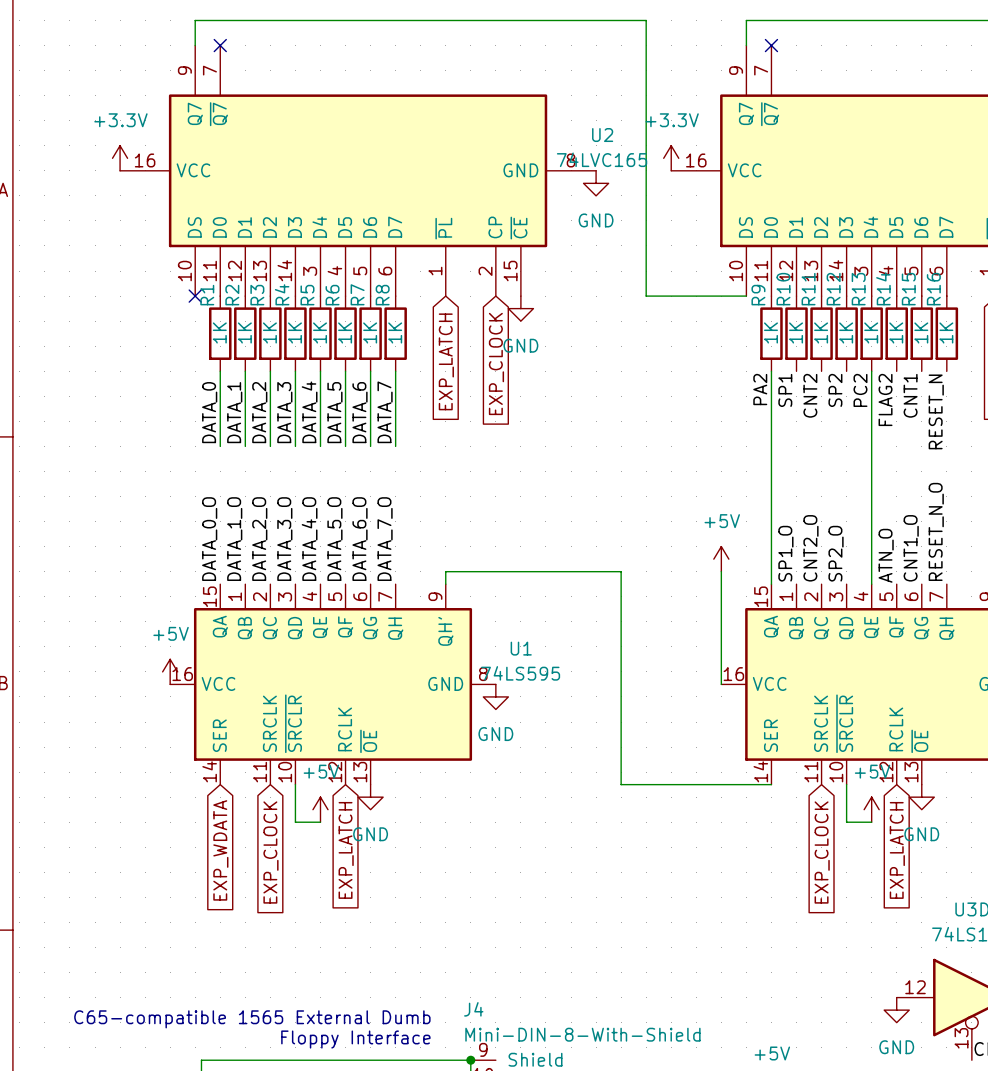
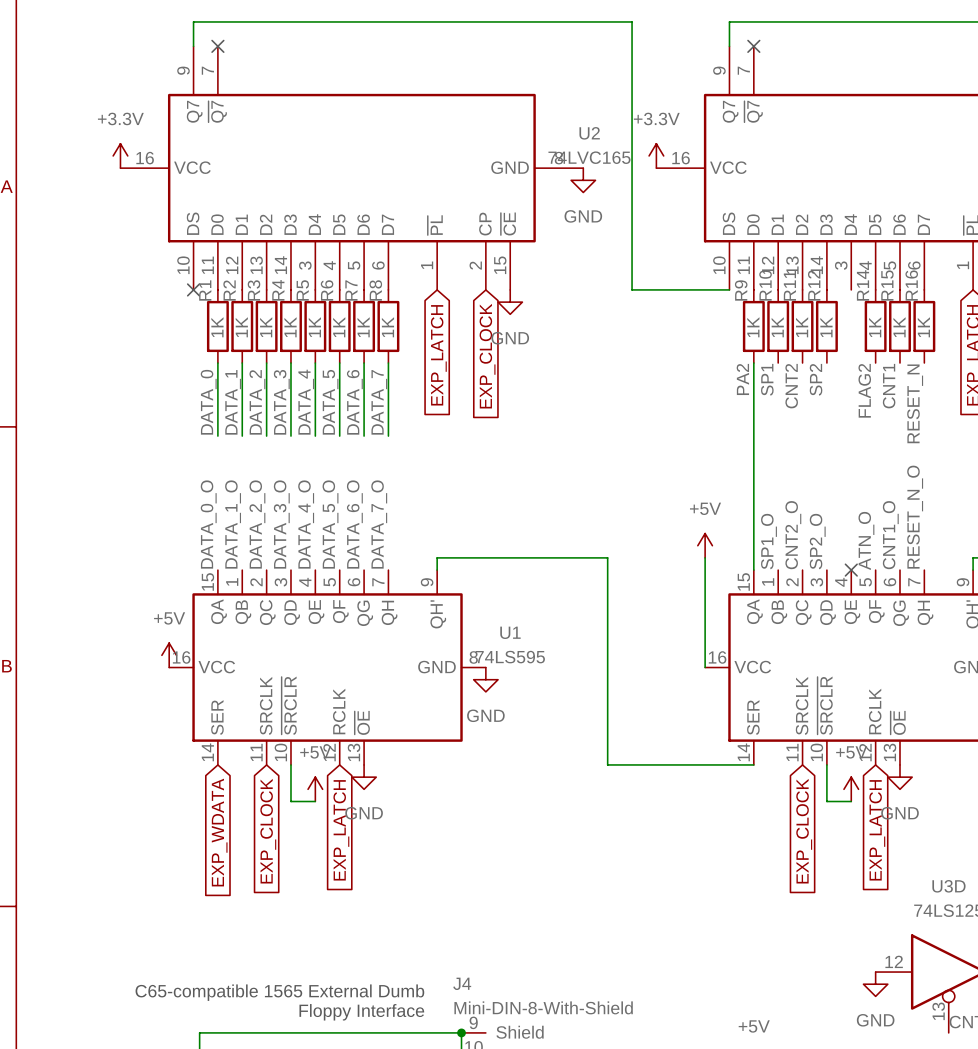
R13: 1K (871, 333) -> none
wire: (871, 371) (871, 584) -> none
label: PC2 (860, 390) -> none
no-connect mark: none -> (851, 570)

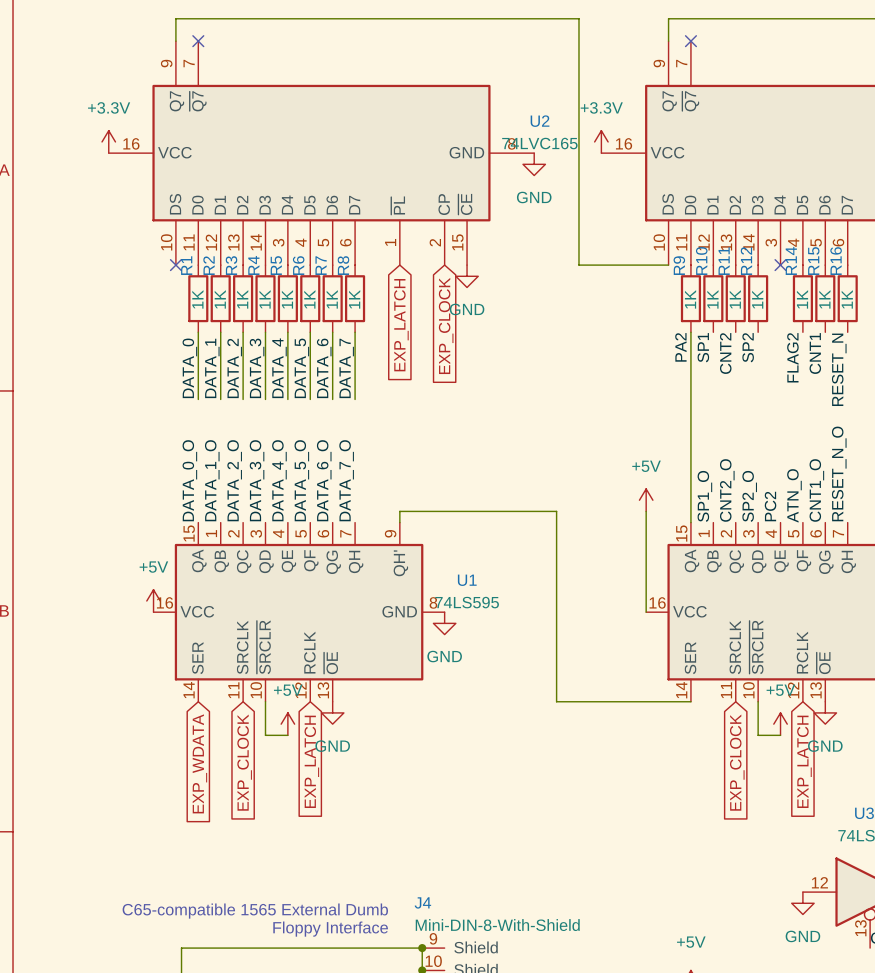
no-connect mark: none -> (780, 265)
label: none -> PC2 (770, 506)
no-connect mark: (851, 570) -> none

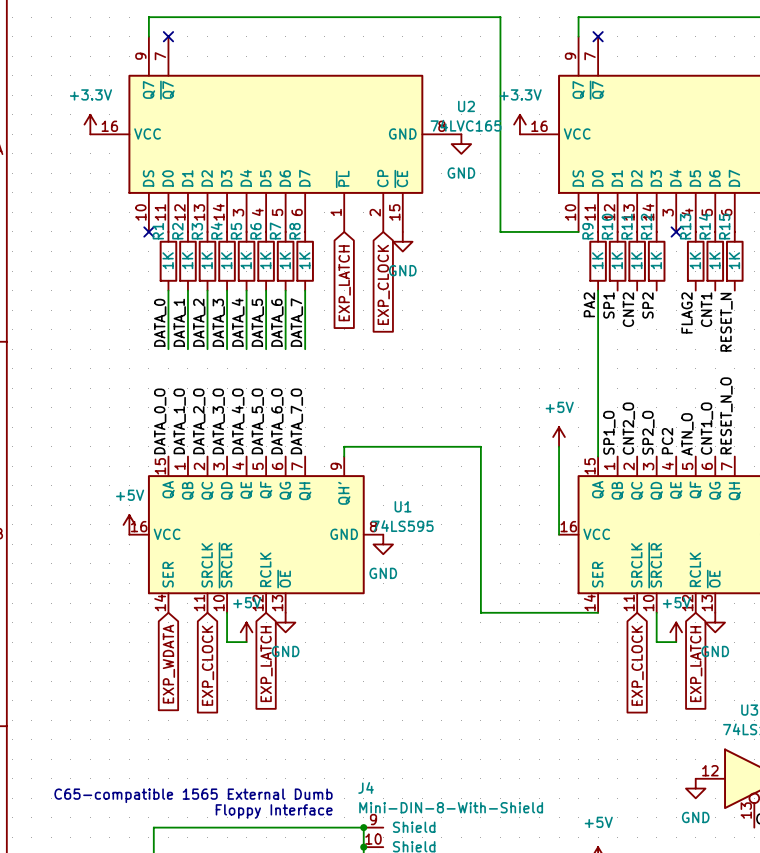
R14 name: R14 (791, 260) -> R13 (685, 226)
R15 name: R15 (813, 261) -> R14 (704, 226)
R16 name: R16 (836, 261) -> R15 (724, 226)

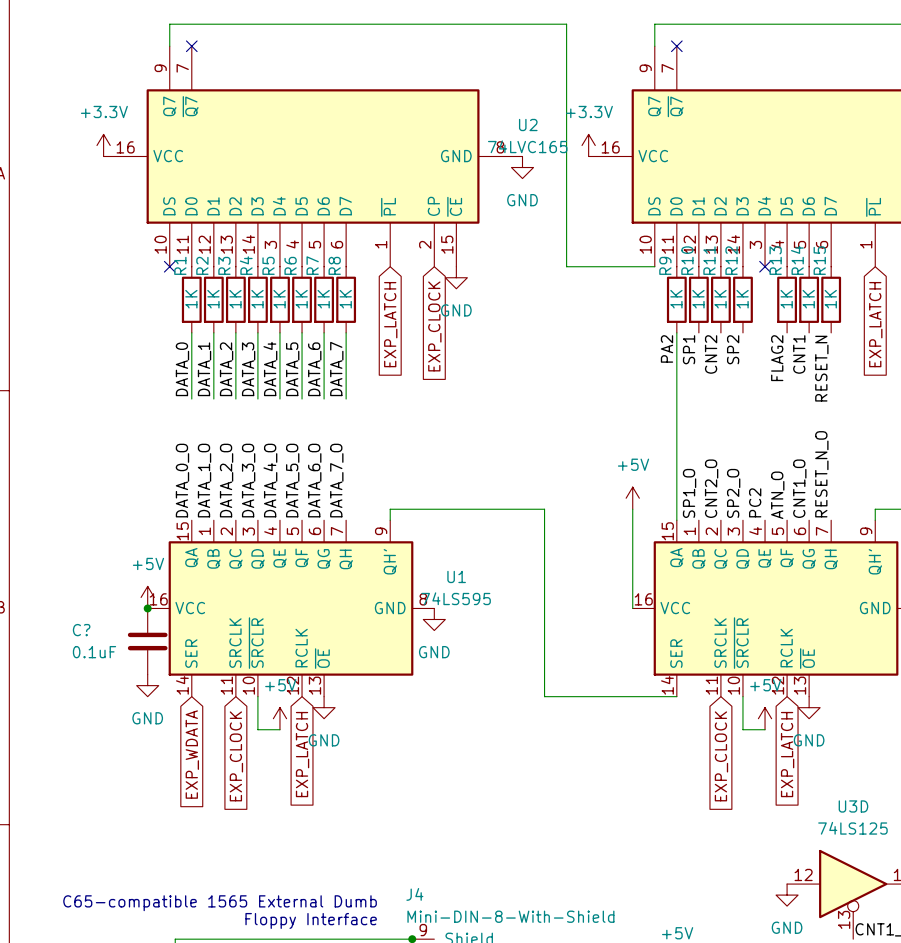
junction: none -> (147, 608)
C?: none -> 0.1uF (147, 641)
power symbol: none -> GND (147, 685)

